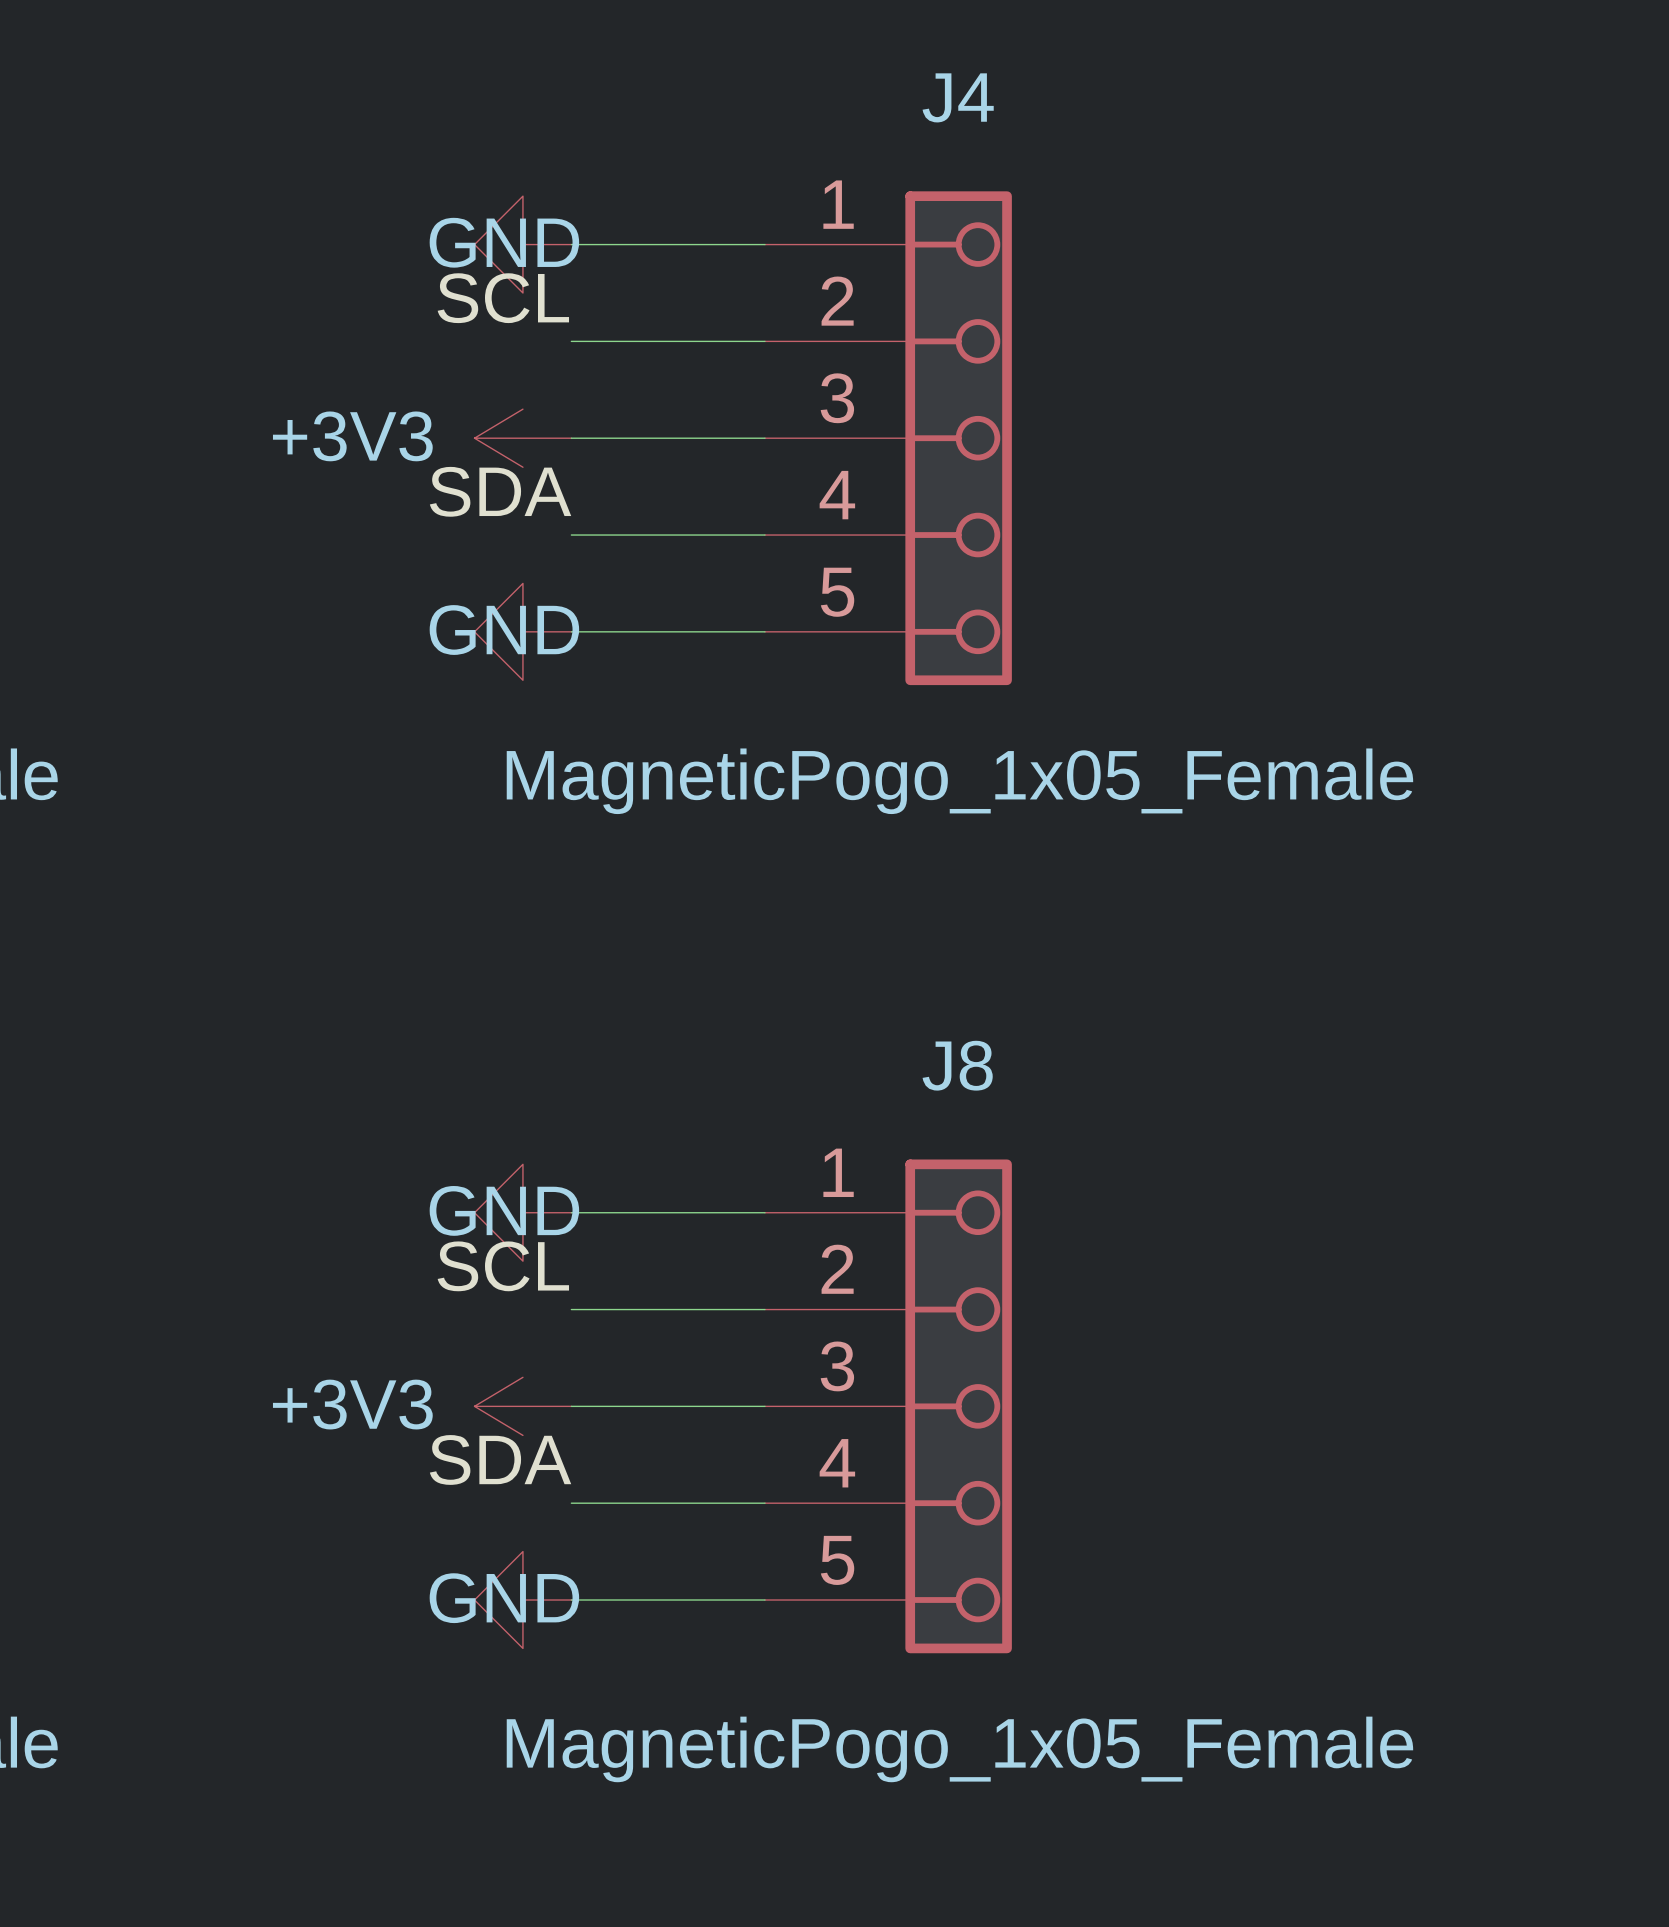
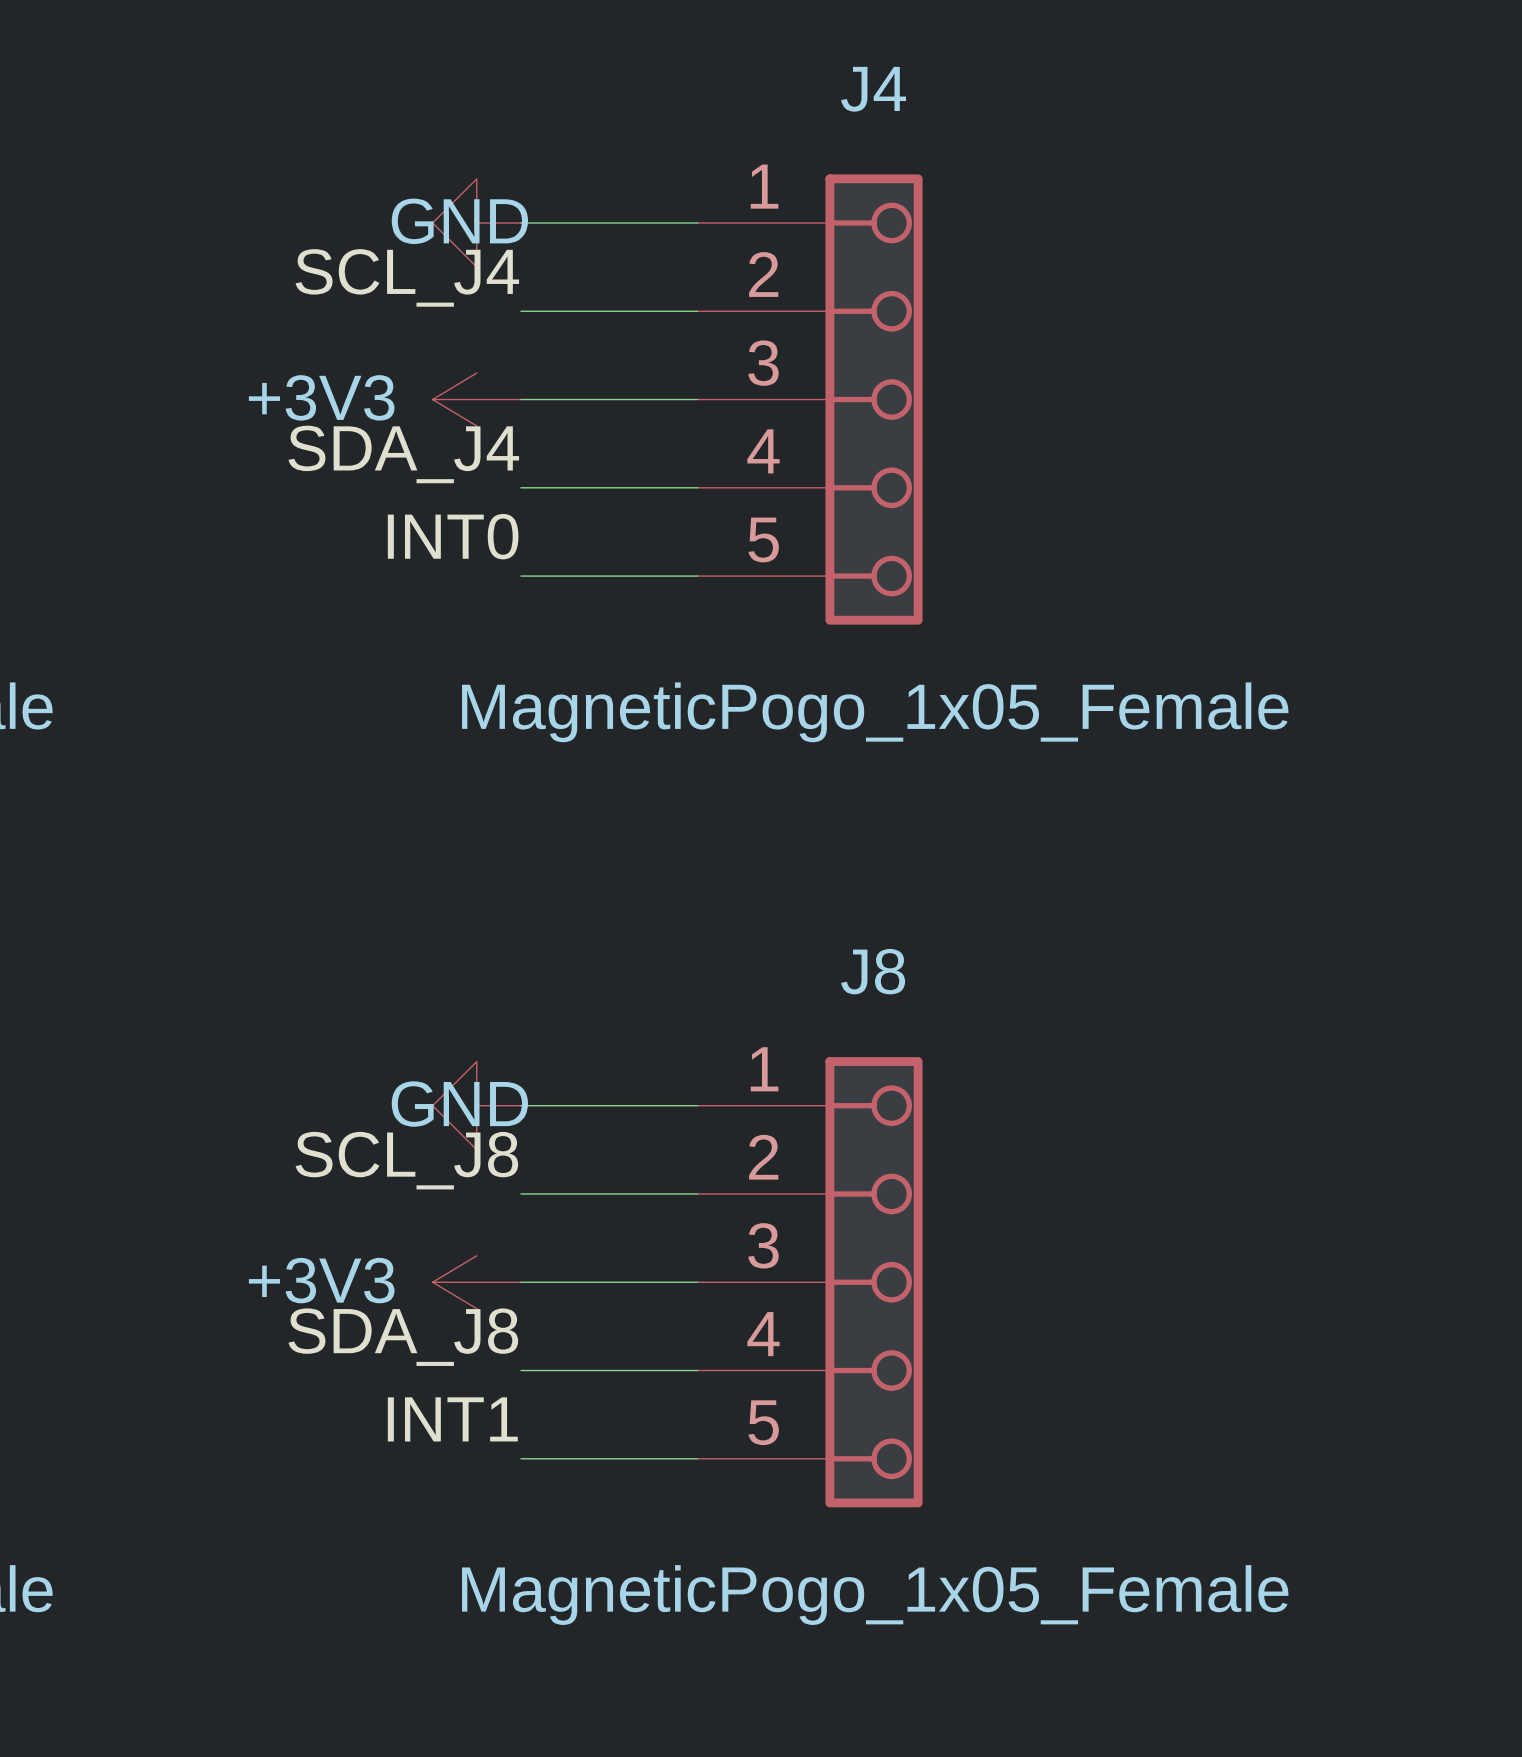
label: SCL (503, 298) -> SCL_J4 (407, 277)
label: SDA (500, 491) -> SDA_J4 (403, 454)
label: none -> INT0 (453, 536)
power symbol: GND (522, 631) -> none
label: SCL (503, 1266) -> SCL_J8 (406, 1160)
label: SDA (500, 1459) -> SDA_J8 (403, 1337)
label: none -> INT1 (452, 1419)
power symbol: GND (522, 1600) -> none

